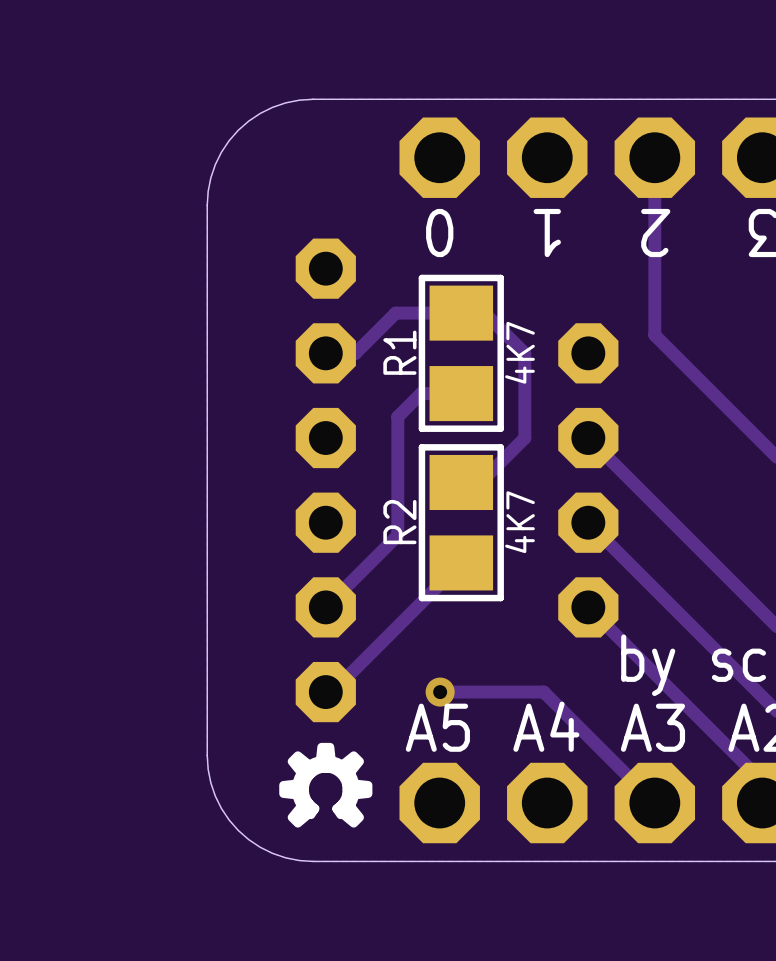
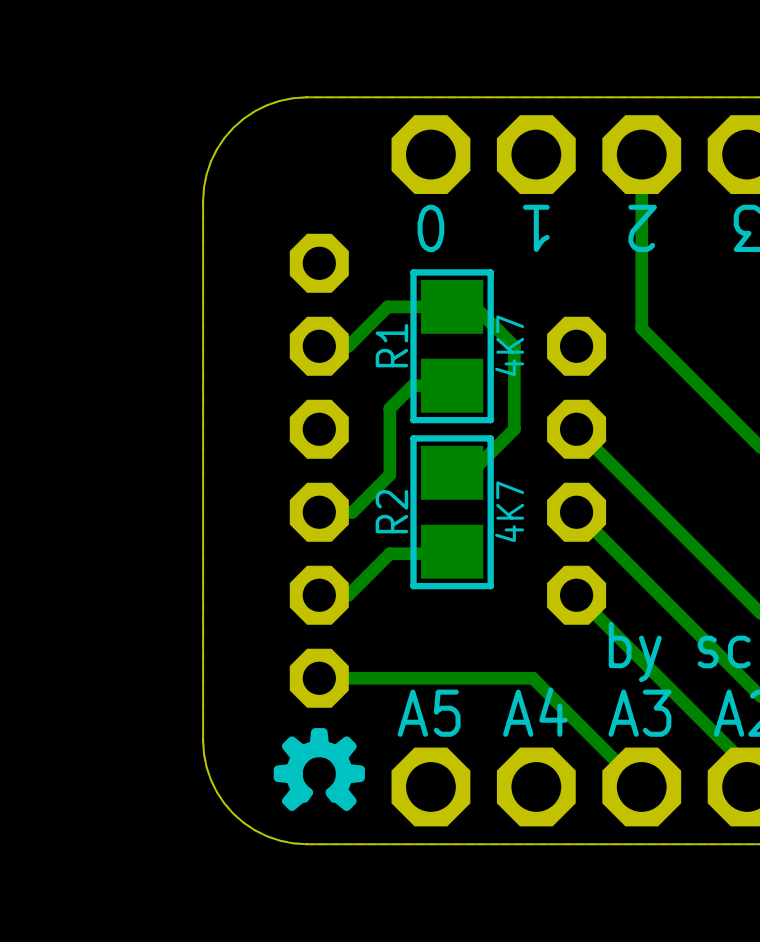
track: (397, 484) (397, 535) (325, 607) -> (389, 474) (352, 512) (319, 512)
track: (459, 565) (332, 692) -> (450, 553) (389, 553) (348, 595) (319, 595)
track: none -> (431, 678) (325, 678)
via: (440, 692) -> none

